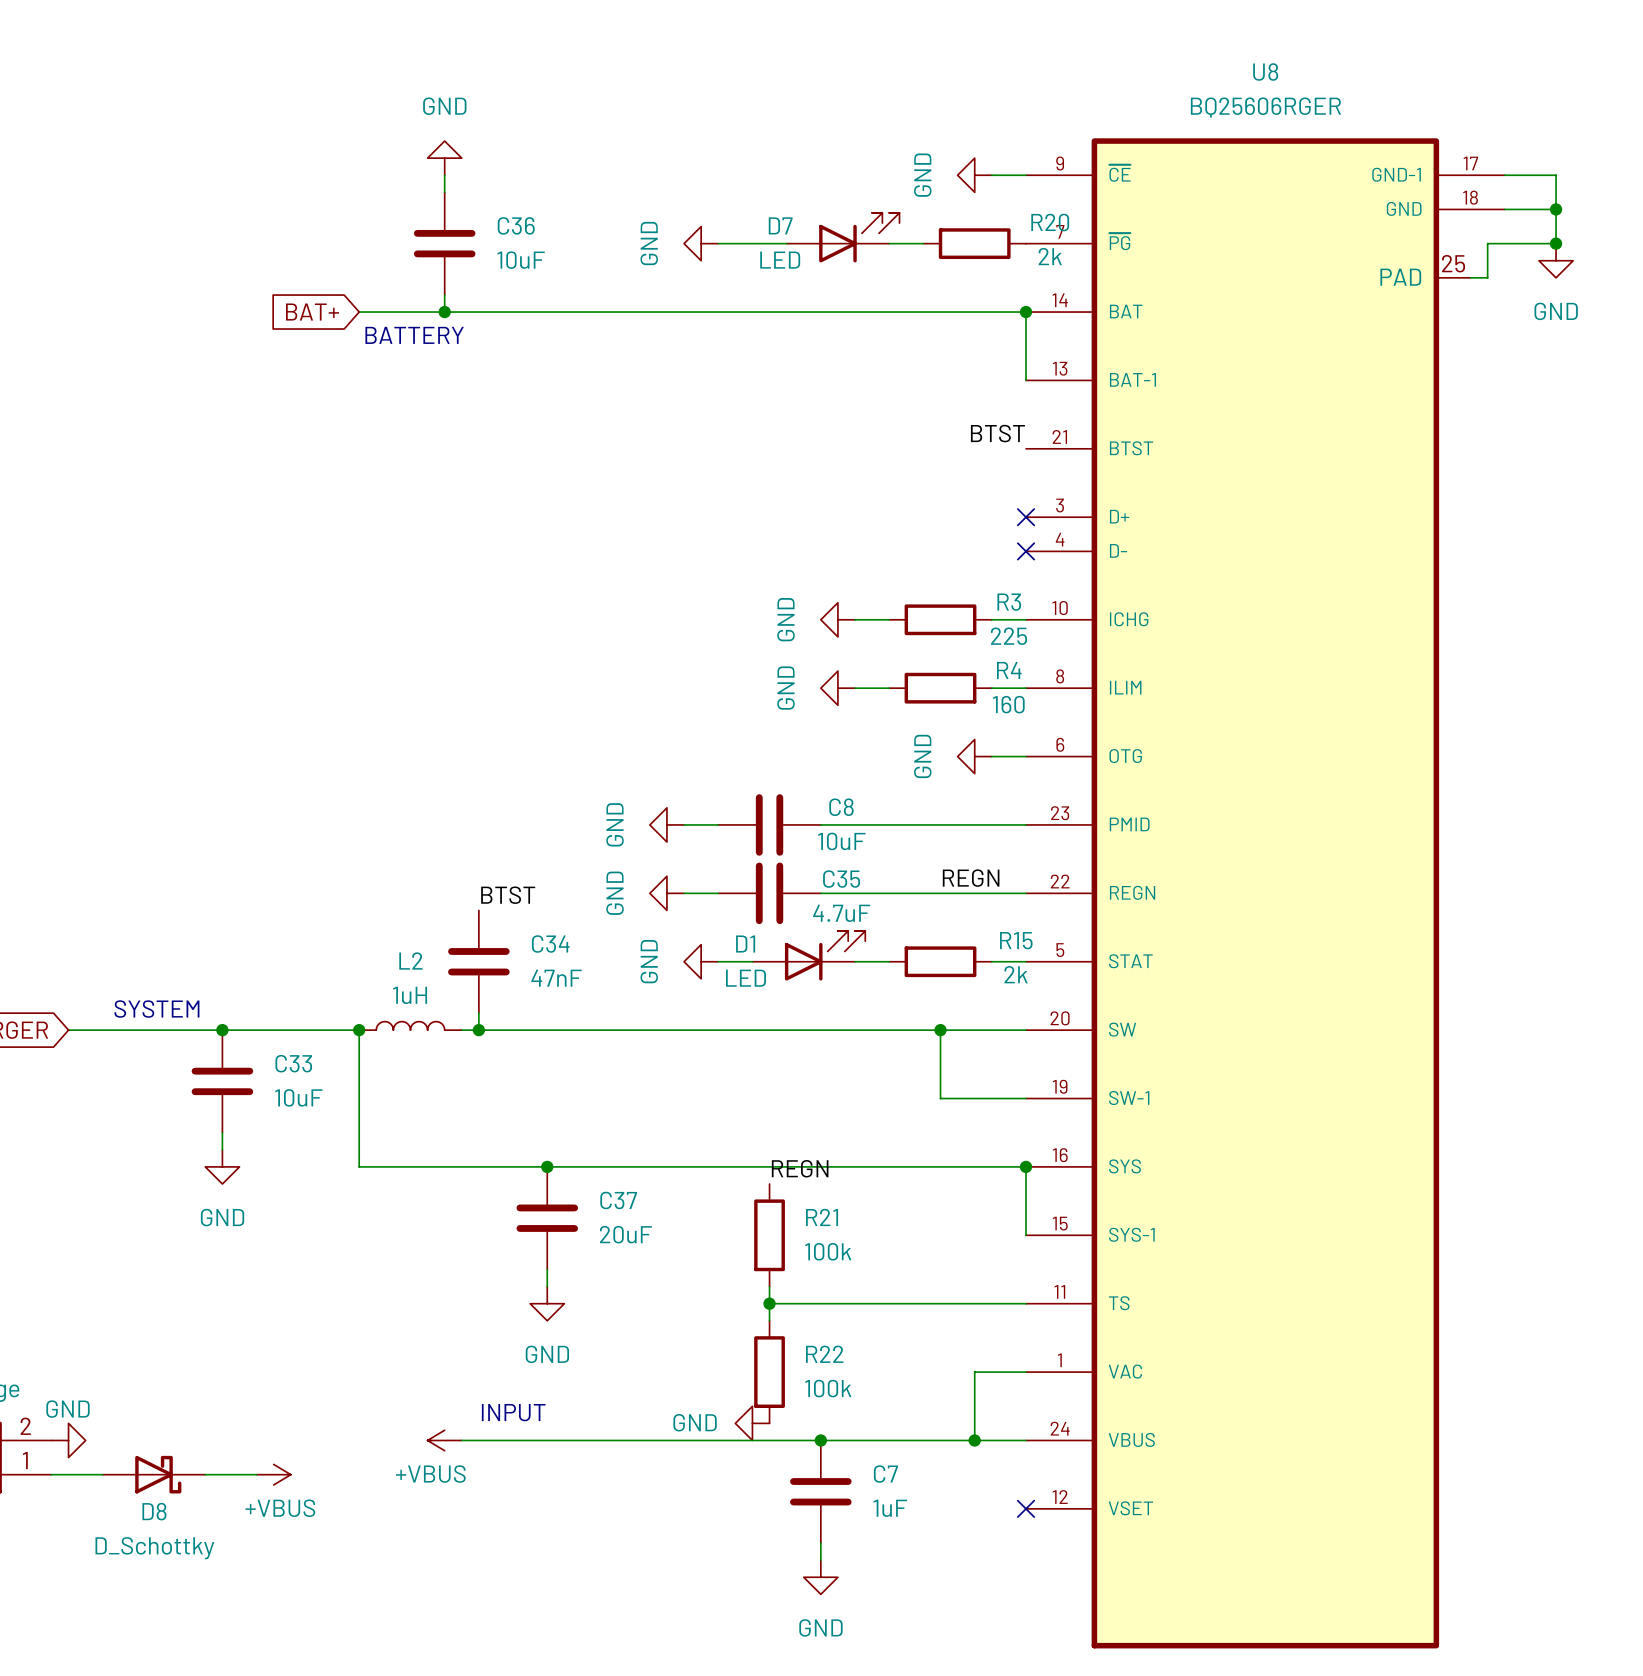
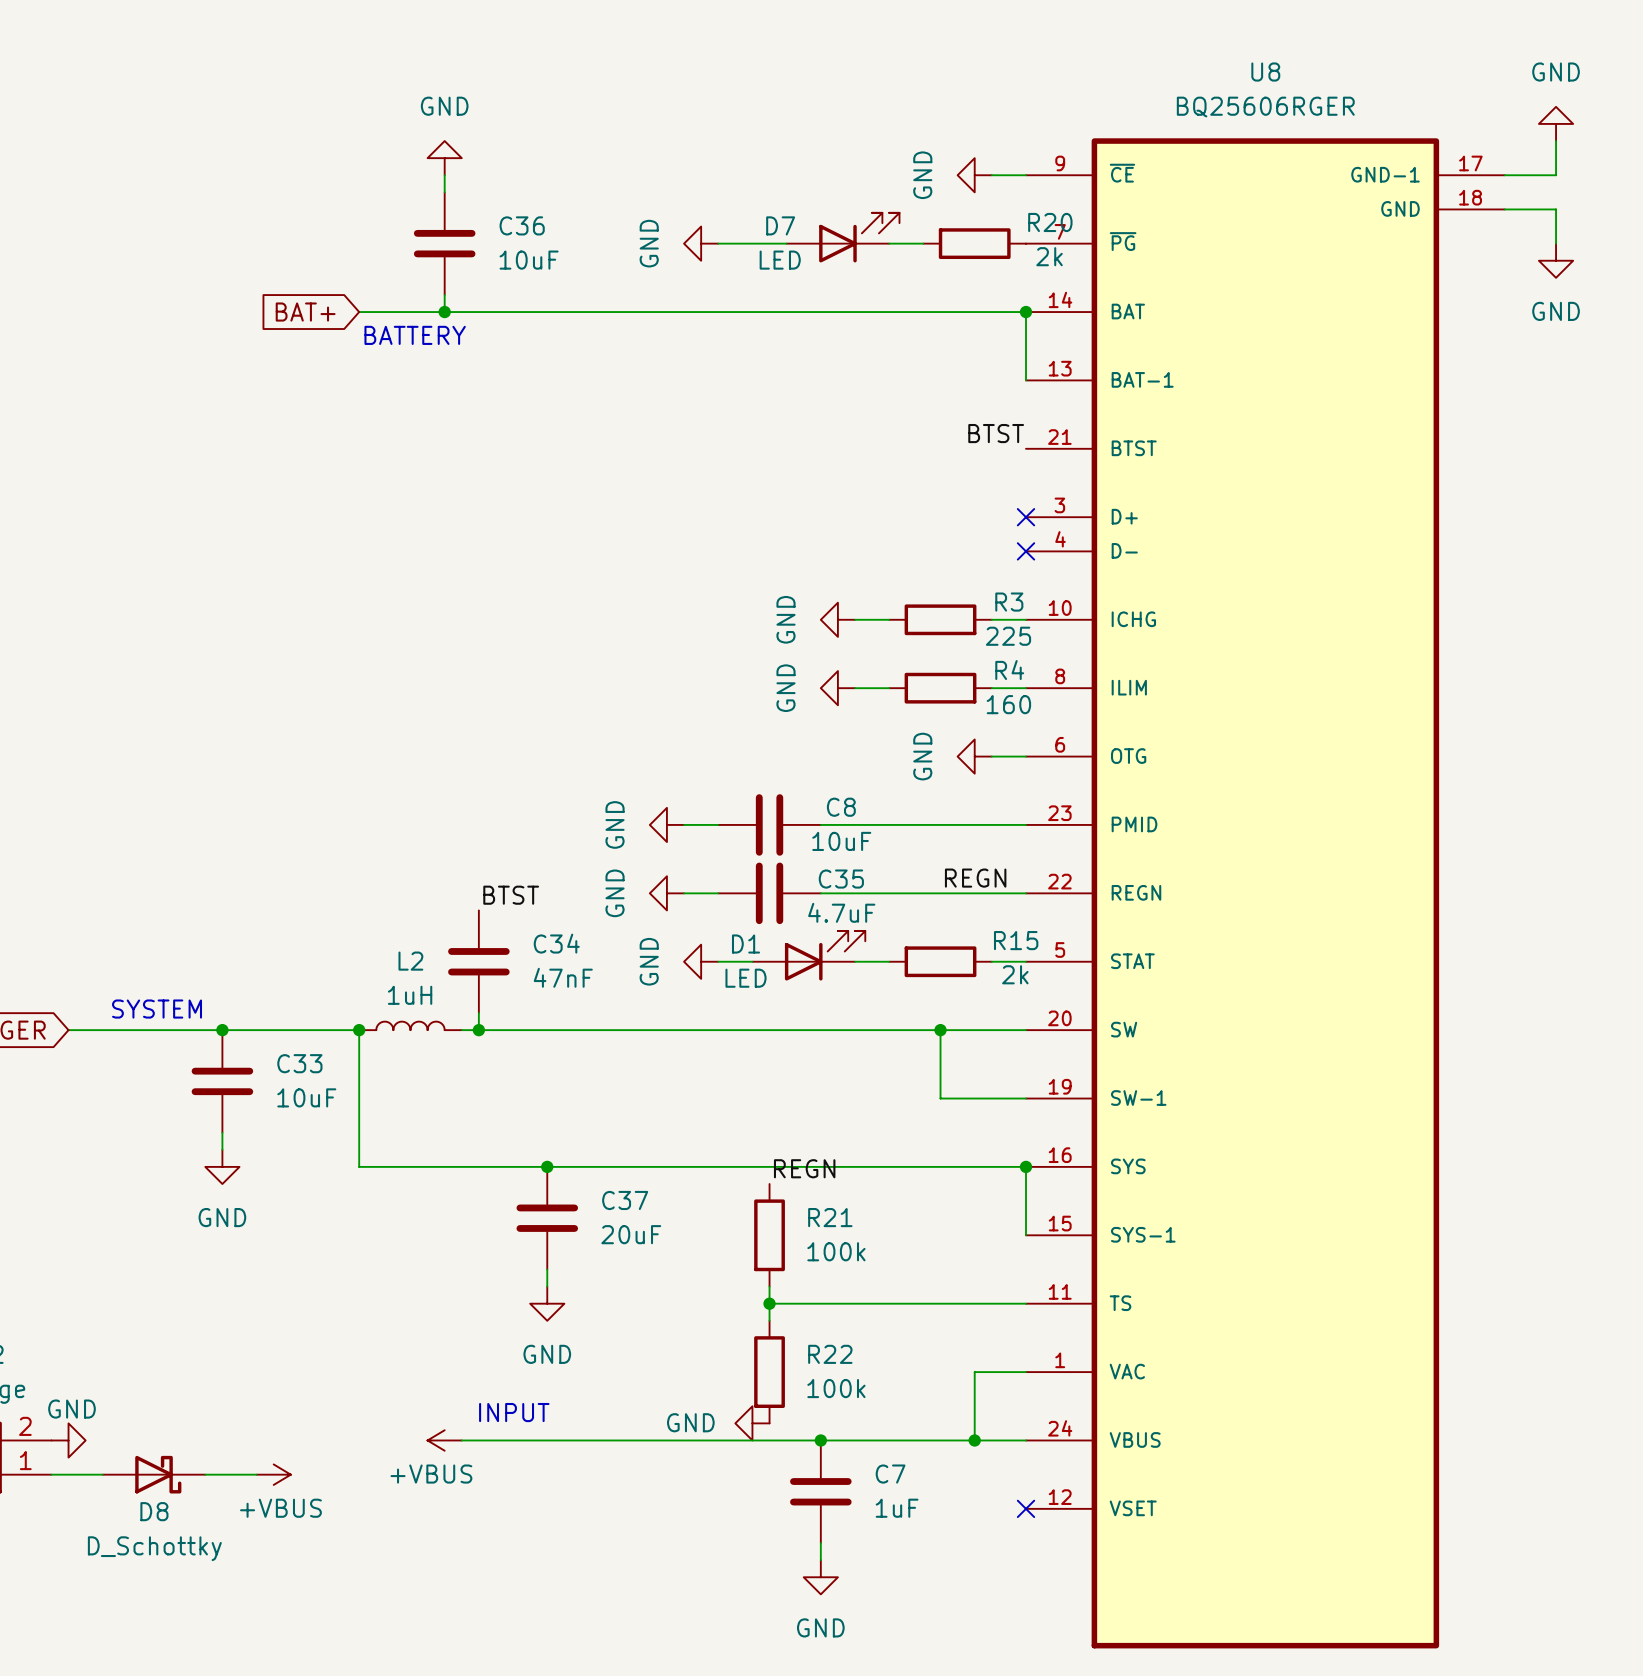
power symbol: none -> GND (1556, 123)
U8 symbol: [1026, 138, 1505, 1649] -> [1026, 138, 1505, 1649]
wire: (1556, 175) (1556, 209) -> (1556, 175) (1556, 141)
junction: (1556, 209) -> none
wire: (1556, 243) (1487, 243) (1487, 277) (1470, 277) -> none
junction: (1556, 243) -> none

